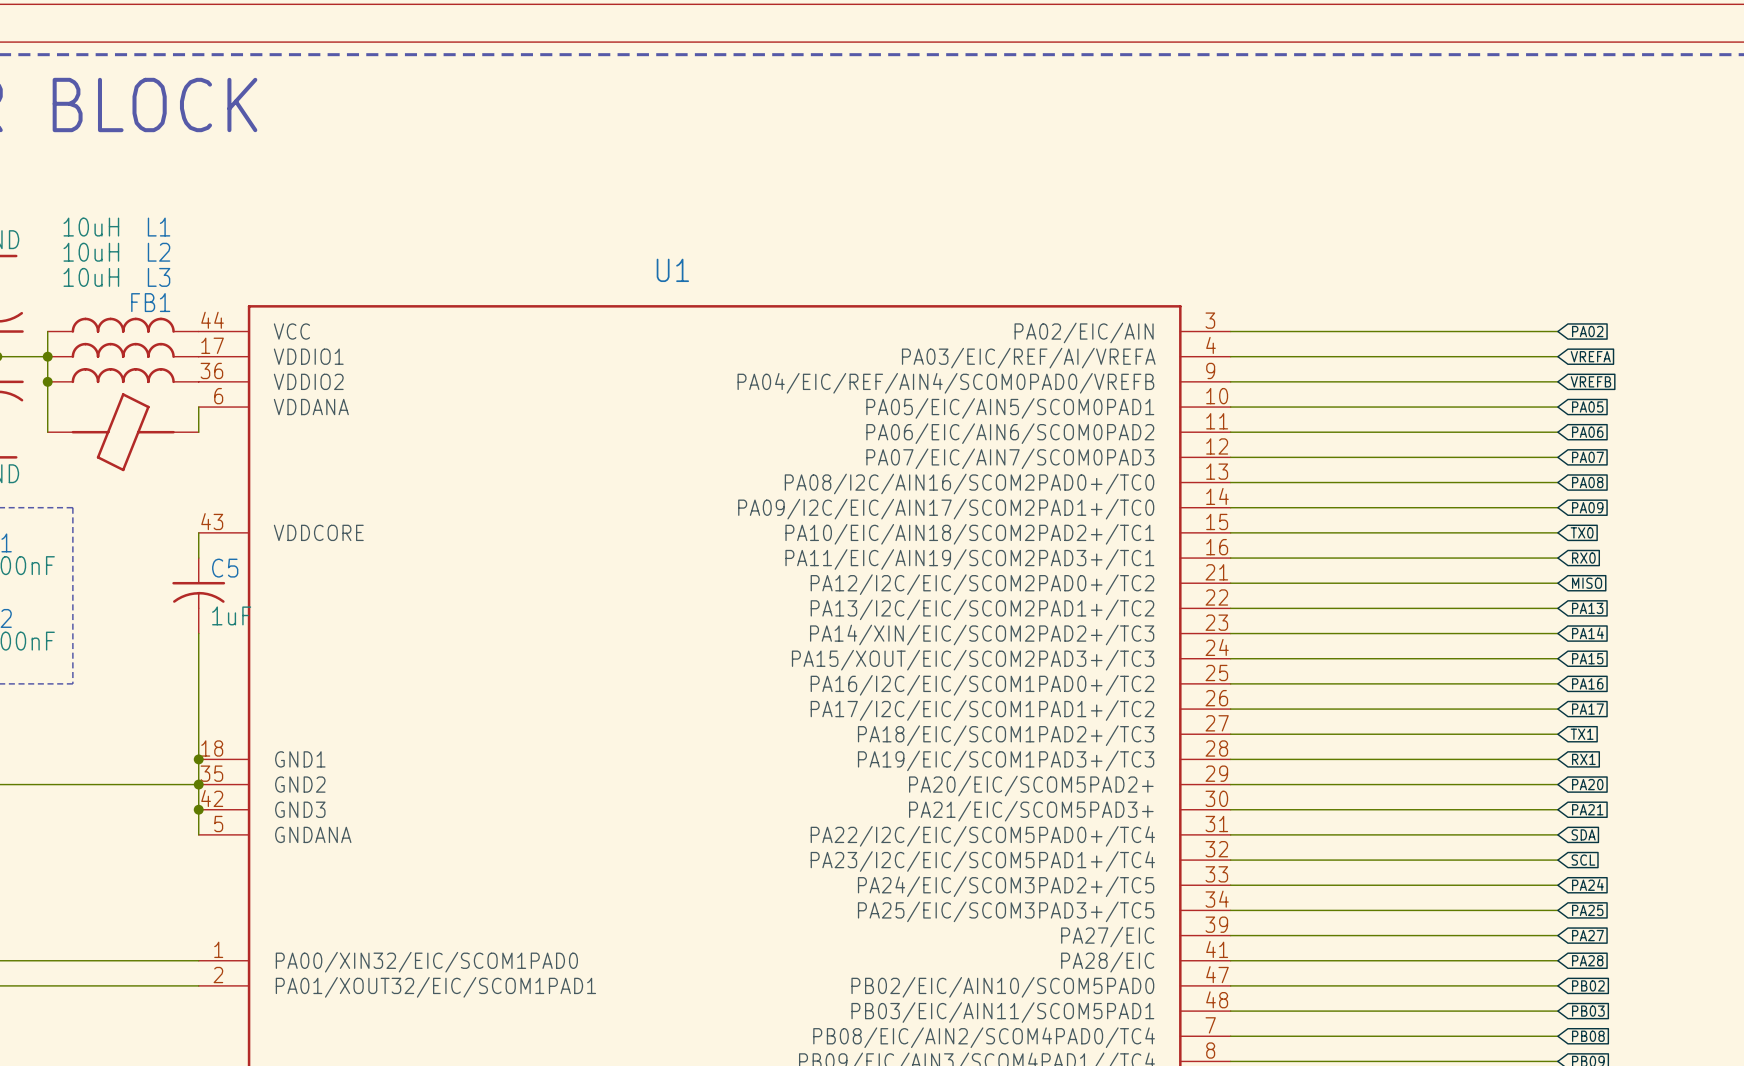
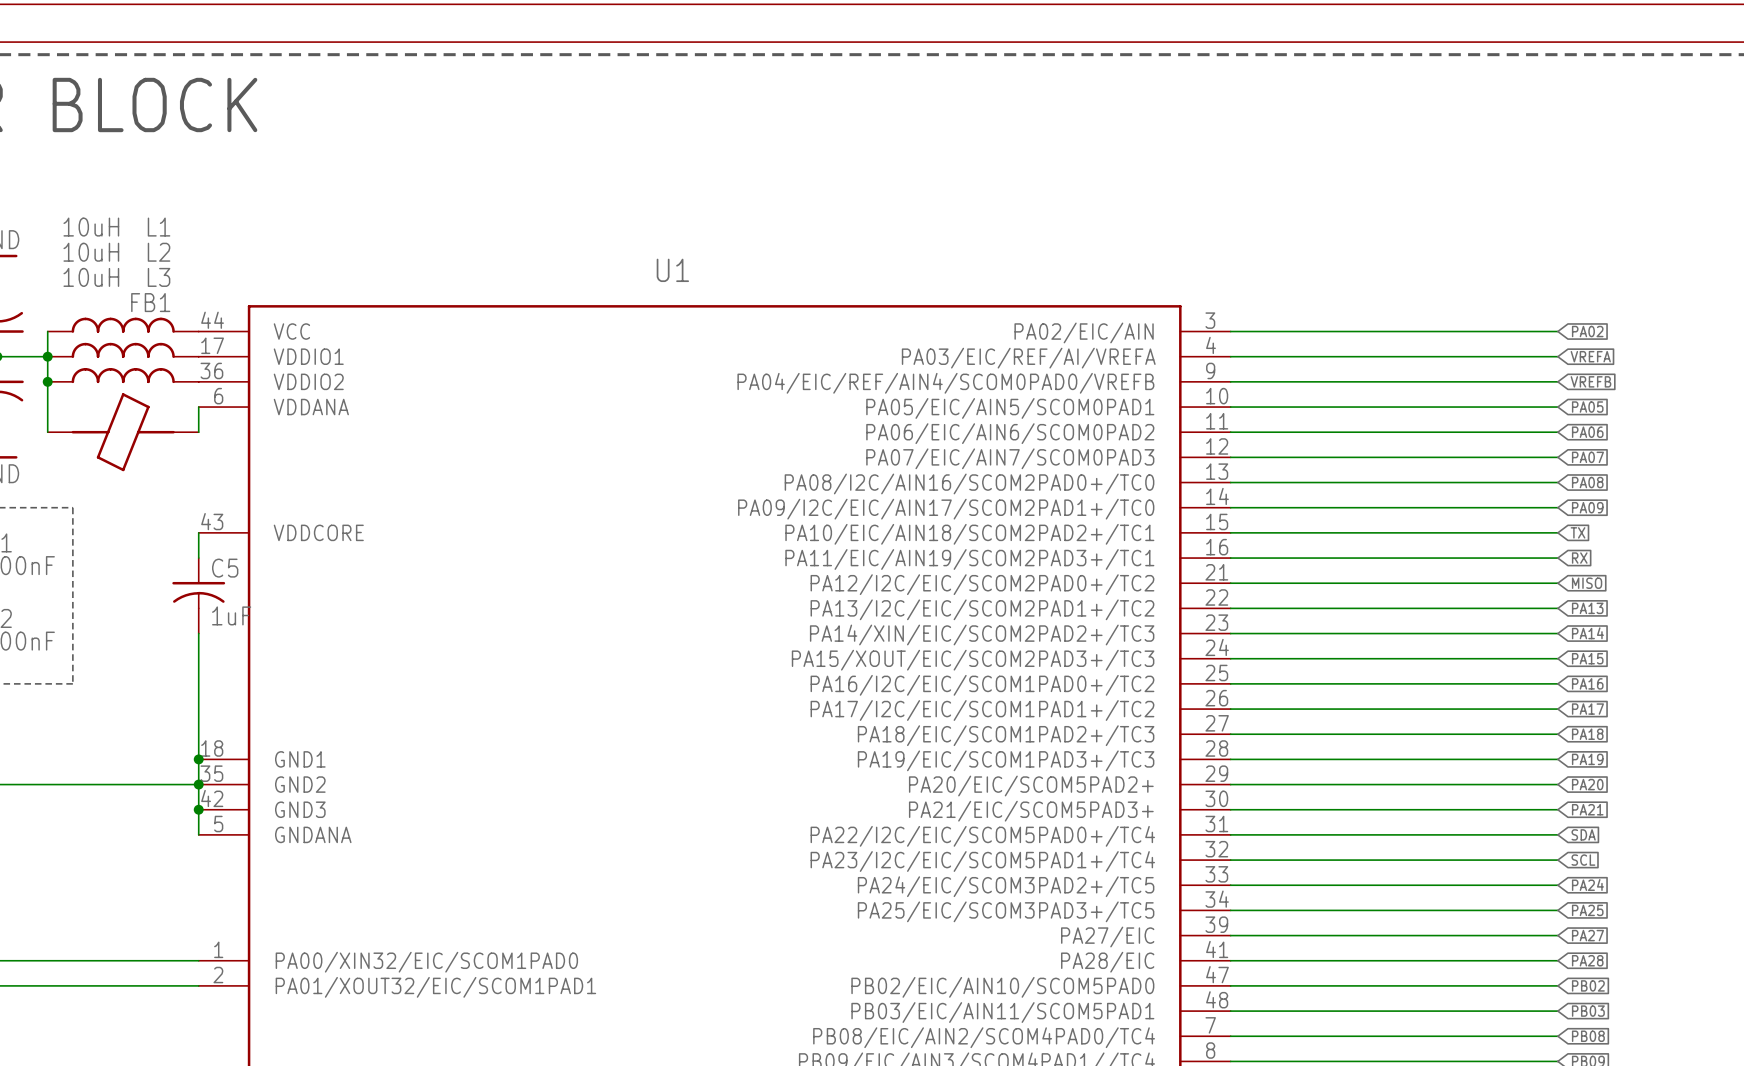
global label: TX0 (1582, 532) -> TX (1578, 532)
global label: RX0 (1583, 558) -> RX (1579, 558)
global label: TX1 (1582, 734) -> PA18 (1587, 734)
global label: RX1 (1583, 759) -> PA19 (1587, 759)

